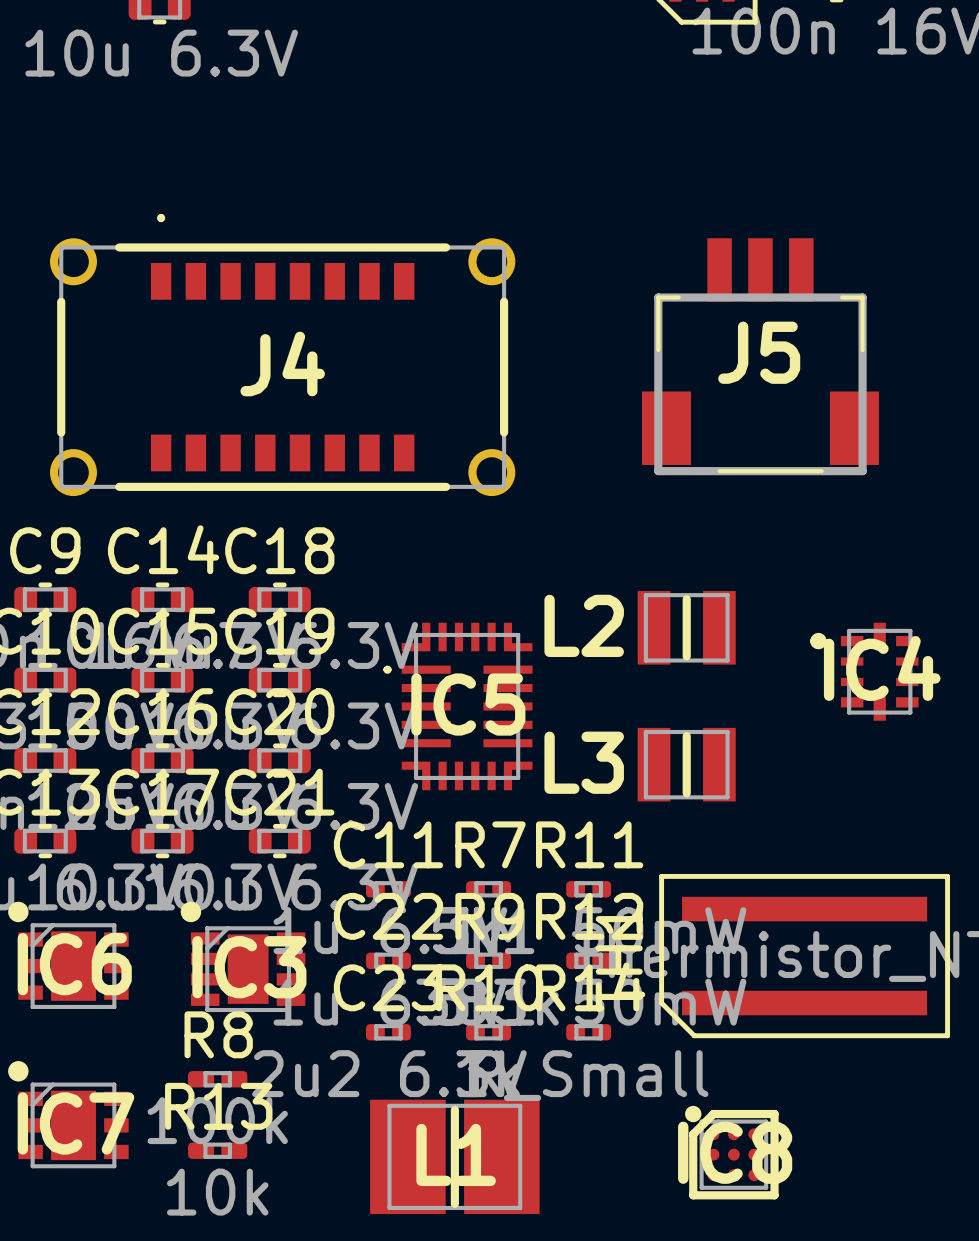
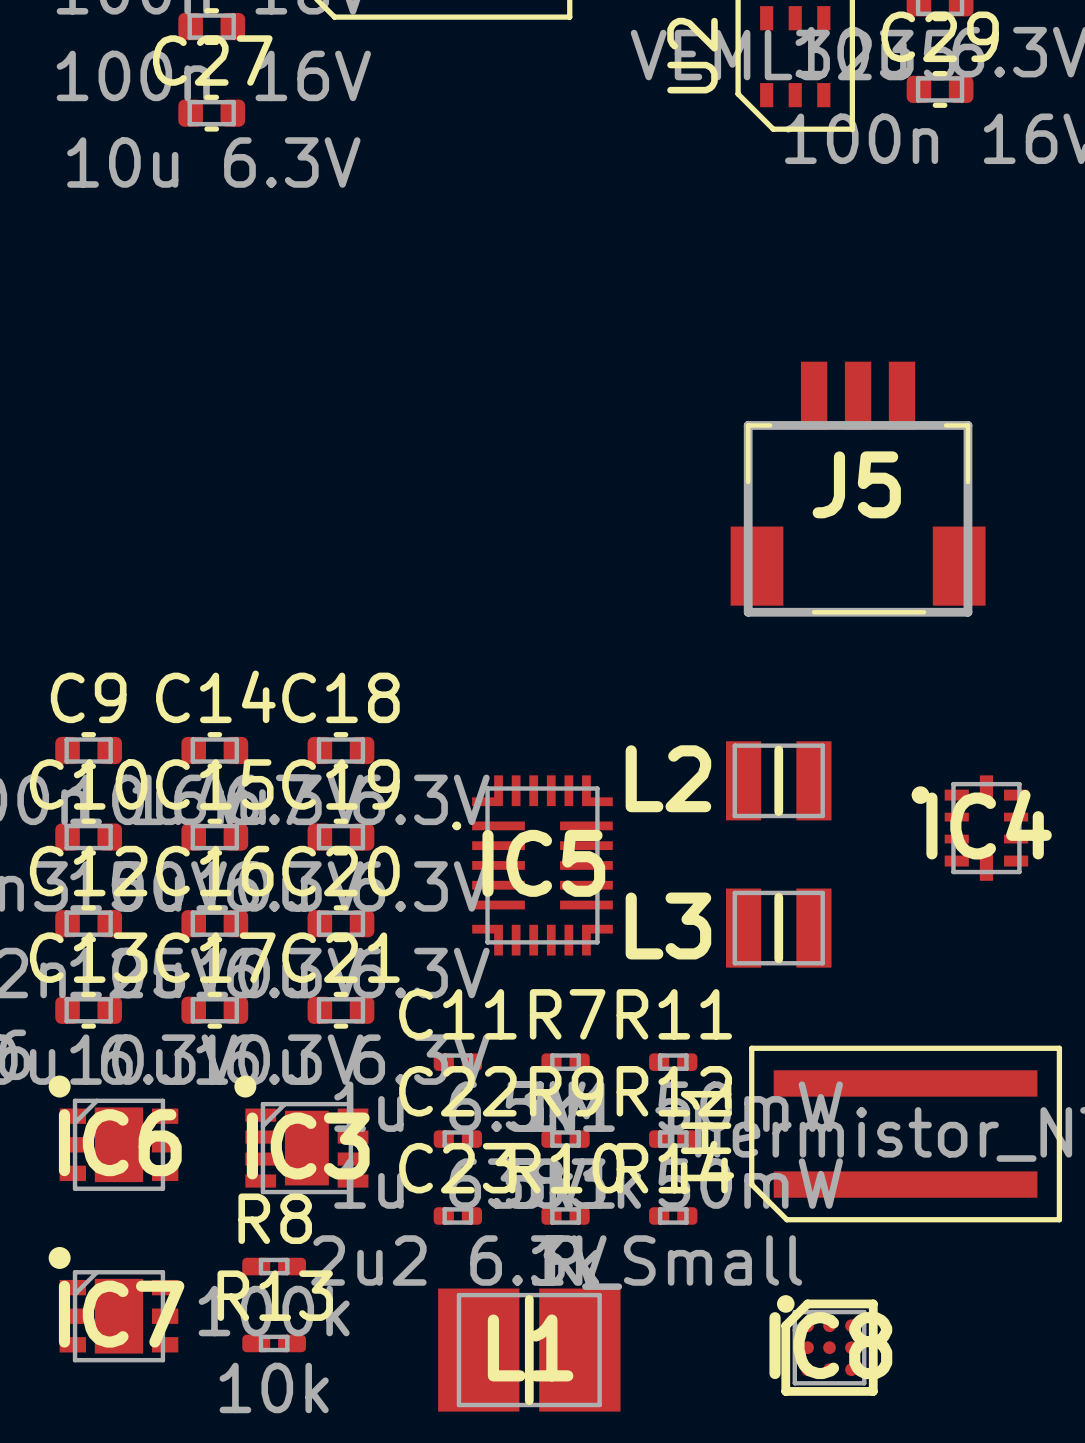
J4: (282, 355) -> none

